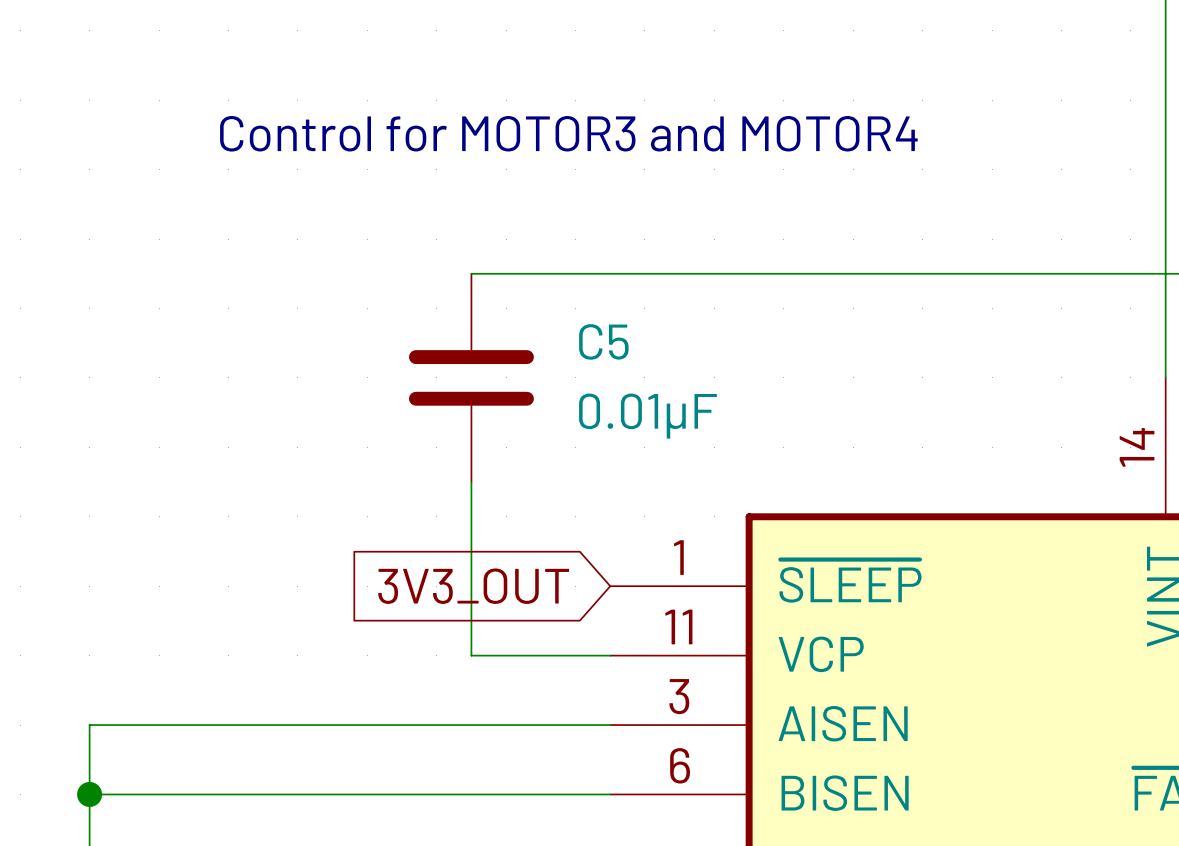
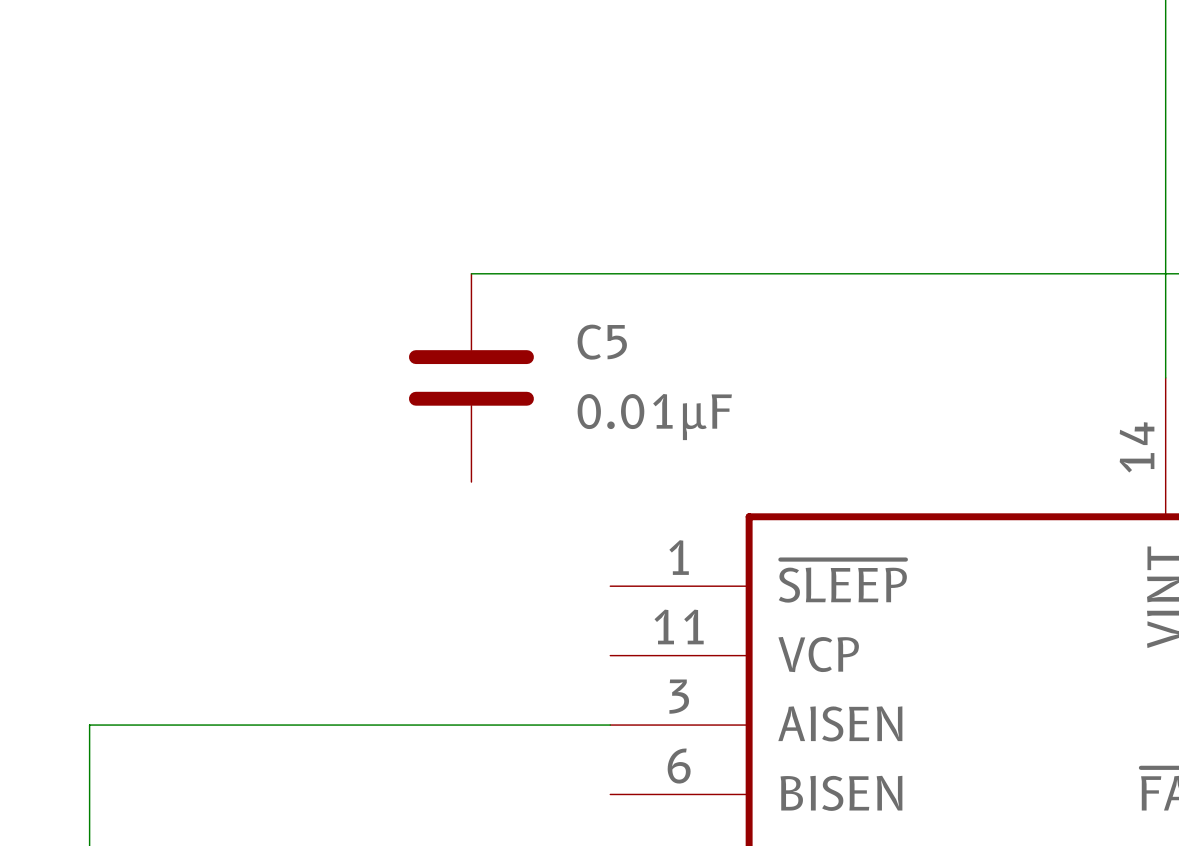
text: Control for MOTOR3 and MOTOR4 (568, 133) -> none
wire: (471, 482) (471, 655) (610, 655) -> none
global label: 3V3_OUT (473, 586) -> none
wire: (89, 794) (610, 794) -> none
junction: (89, 794) -> none

